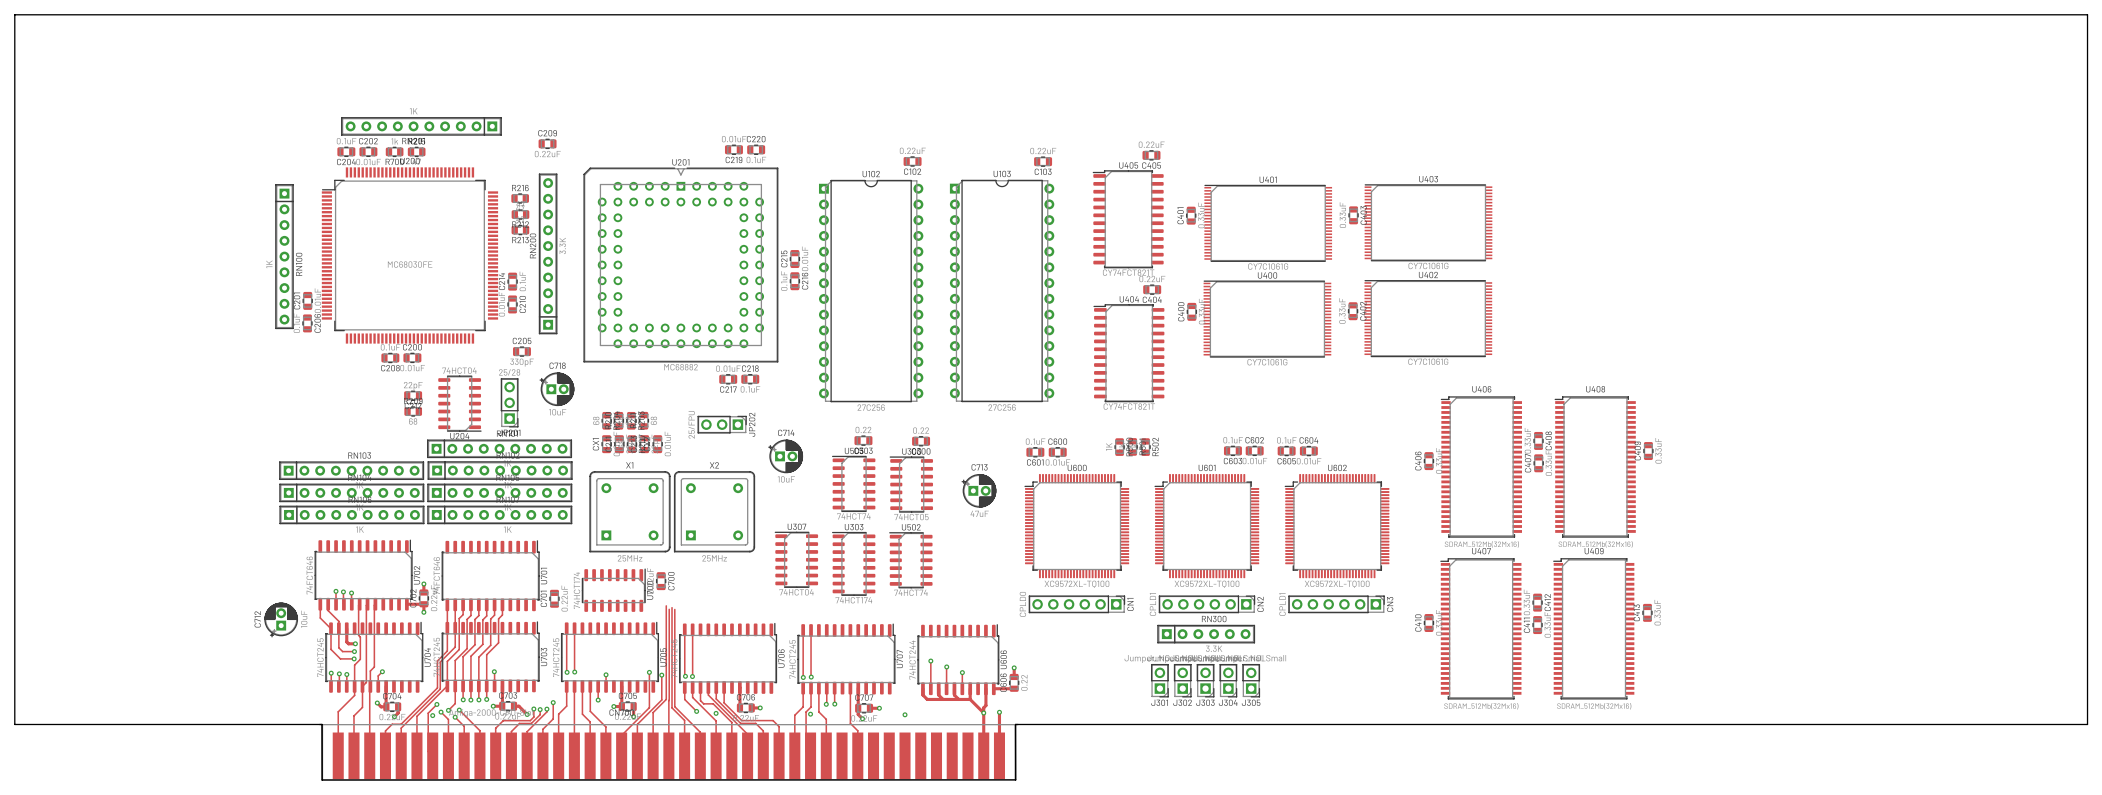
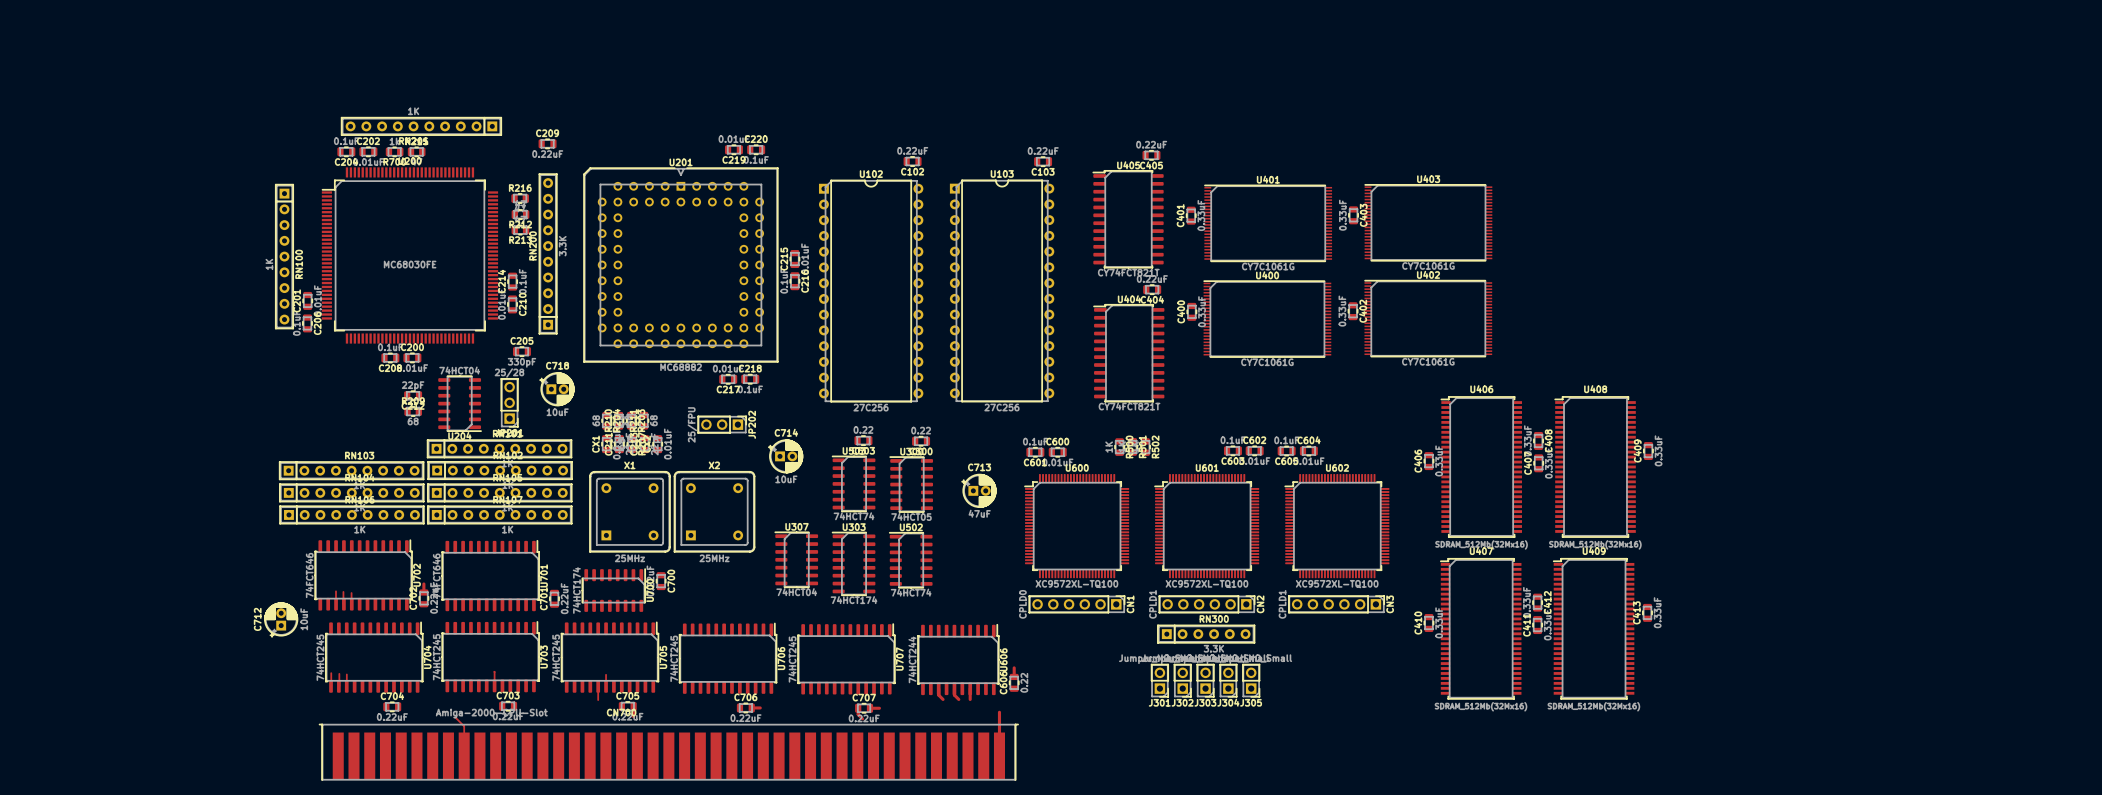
board edge: (14, 14) (14, 724) (322, 724) (322, 780) (1015, 779) (1015, 724) (2087, 724) (2087, 14) (14, 14) -> none
via: (423, 583) -> none
via: (336, 591) -> none
via: (343, 591) -> none
via: (351, 593) -> none
track: (320, 604) (320, 618) (331, 628) (331, 649) (340, 658) (354, 658) -> none
track: (328, 604) (328, 610) (338, 621) (338, 647) (342, 651) (354, 651) -> none
track: (359, 604) (360, 659) (354, 665) (354, 695) (338, 711) (338, 756) -> none
track: (367, 604) (366, 682) (362, 686) (362, 707) (353, 715) (353, 756) -> none
track: (375, 604) (374, 667) (370, 671) (369, 687) (369, 756) -> none
track: (406, 604) (423, 604) (423, 612) -> none
track: (447, 604) (447, 651) (437, 660) (437, 687) (401, 724) (392, 724) (385, 730) (385, 756) -> none
track: (455, 604) (455, 647) (440, 662) (440, 689) (401, 728) (401, 756) -> none
track: (463, 604) (463, 614) (459, 618) (459, 649) (447, 661) (447, 685) (416, 716) (416, 756) -> none
track: (470, 604) (470, 615) (467, 619) (467, 648) (455, 660) (455, 703) (448, 710) -> none
track: (478, 604) (478, 615) (474, 619) (474, 644) (463, 656) (463, 699) -> none
track: (486, 604) (486, 616) (482, 619) (482, 644) (470, 656) (470, 700) -> none
track: (494, 604) (494, 615) (490, 619) (490, 645) (478, 657) (478, 699) -> none
track: (502, 604) (502, 614) (498, 618) (498, 642) (486, 654) (486, 699) -> none
track: (666, 605) (666, 699) (653, 712) (653, 756) -> none
track: (672, 607) (672, 707) (684, 720) (684, 756) -> none
track: (669, 609) (668, 756) -> none
track: (674, 609) (674, 706) (700, 732) (700, 756) -> none
via: (423, 612) -> none
track: (346, 628) (346, 641) (355, 643) -> none
track: (566, 628) (567, 672) -> none
track: (574, 628) (574, 672) -> none
track: (684, 629) (685, 676) -> none
track: (692, 629) (692, 676) -> none
track: (803, 630) (803, 677) -> none
track: (811, 630) (811, 677) -> none
via: (355, 643) -> none
via: (354, 651) -> none
via: (354, 658) -> none
track: (930, 661) (930, 688) -> none
via: (930, 661) -> none
track: (946, 666) (946, 688) -> none
via: (946, 666) -> none
via: (1014, 667) -> none
track: (382, 671) (378, 675) (378, 686) -> none
via: (382, 671) -> none
via: (494, 671) -> none
via: (567, 672) -> none
via: (574, 672) -> none
track: (649, 672) (649, 707) (621, 735) (621, 756) -> none
via: (649, 672) -> none
track: (962, 672) (962, 688) -> none
via: (962, 672) -> none
via: (331, 673) -> none
via: (339, 673) -> none
via: (346, 674) -> none
via: (606, 674) -> none
track: (661, 675) (661, 700) (637, 724) (637, 756) -> none
via: (661, 675) -> none
via: (685, 676) -> none
via: (692, 676) -> none
via: (803, 677) -> none
via: (811, 677) -> none
track: (502, 685) (502, 706) (493, 706) -> none
track: (386, 686) (386, 706) (381, 706) (377, 702) -> none
track: (566, 686) (566, 706) (558, 714) (558, 756) -> none
track: (574, 686) (574, 756) -> none
track: (582, 686) (582, 714) (590, 721) (590, 756) -> none
track: (590, 686) (590, 711) (605, 726) (605, 756) -> none
track: (621, 686) (621, 706) (613, 706) -> none
track: (684, 687) (684, 699) (696, 711) -> none
track: (692, 687) (692, 697) (716, 720) (716, 756) -> none
track: (700, 687) (700, 700) (703, 703) (713, 703) (731, 722) (731, 756) -> none
track: (708, 687) (708, 695) (747, 734) (747, 756) -> none
track: (716, 687) (716, 699) (740, 723) (755, 723) (763, 730) (763, 756) -> none
track: (724, 687) (724, 702) (741, 720) (773, 720) (779, 726) (779, 756) -> none
track: (739, 687) (739, 707) -> none
track: (803, 688) (803, 706) (794, 715) (794, 756) -> none
track: (811, 688) (811, 707) (806, 712) (806, 751) (810, 756) -> none
track: (818, 688) (818, 711) (826, 719) (826, 756) -> none
track: (826, 688) (826, 704) -> none
track: (834, 688) (834, 704) -> none
track: (850, 688) (850, 723) (857, 730) (857, 756) -> none
track: (858, 688) (858, 708) -> none
track: (922, 688) (922, 695) (927, 699) (970, 699) (983, 712) -> none
track: (985, 688) (985, 705) (983, 707) (983, 756) -> none
track: (993, 688) (1014, 688) -> none
via: (463, 699) -> none
via: (478, 699) -> none
via: (486, 699) -> none
via: (470, 700) -> none
via: (598, 700) -> none
via: (377, 702) -> none
track: (553, 702) (553, 718) (542, 729) (542, 756) -> none
via: (553, 702) -> none
via: (436, 704) -> none
track: (437, 704) (428, 713) (428, 751) (432, 756) -> none
via: (826, 704) -> none
via: (834, 704) -> none
track: (398, 706) (398, 713) (394, 716) -> none
via: (493, 706) -> none
track: (514, 706) (518, 706) (527, 714) -> none
via: (613, 706) -> none
via: (760, 707) -> none
track: (533, 708) (533, 717) (530, 720) (503, 720) (495, 728) (495, 756) -> none
via: (533, 708) -> none
via: (879, 708) -> none
track: (540, 709) (540, 714) (531, 723) (519, 723) (511, 731) (511, 756) -> none
via: (540, 709) -> none
track: (546, 709) (546, 711) (527, 731) (527, 756) -> none
via: (546, 709) -> none
via: (448, 710) -> none
track: (459, 710) (479, 730) (479, 756) -> none
via: (459, 710) -> none
via: (696, 711) -> none
track: (441, 712) (448, 719) (448, 756) -> none
via: (441, 712) -> none
via: (983, 712) -> none
via: (999, 712) -> none
via: (716, 713) -> none
via: (527, 714) -> none
via: (810, 714) -> none
via: (905, 714) -> none
via: (432, 715) -> none
via: (394, 716) -> none
via: (633, 716) -> none
via: (455, 717) -> none
via: (862, 718) -> none

